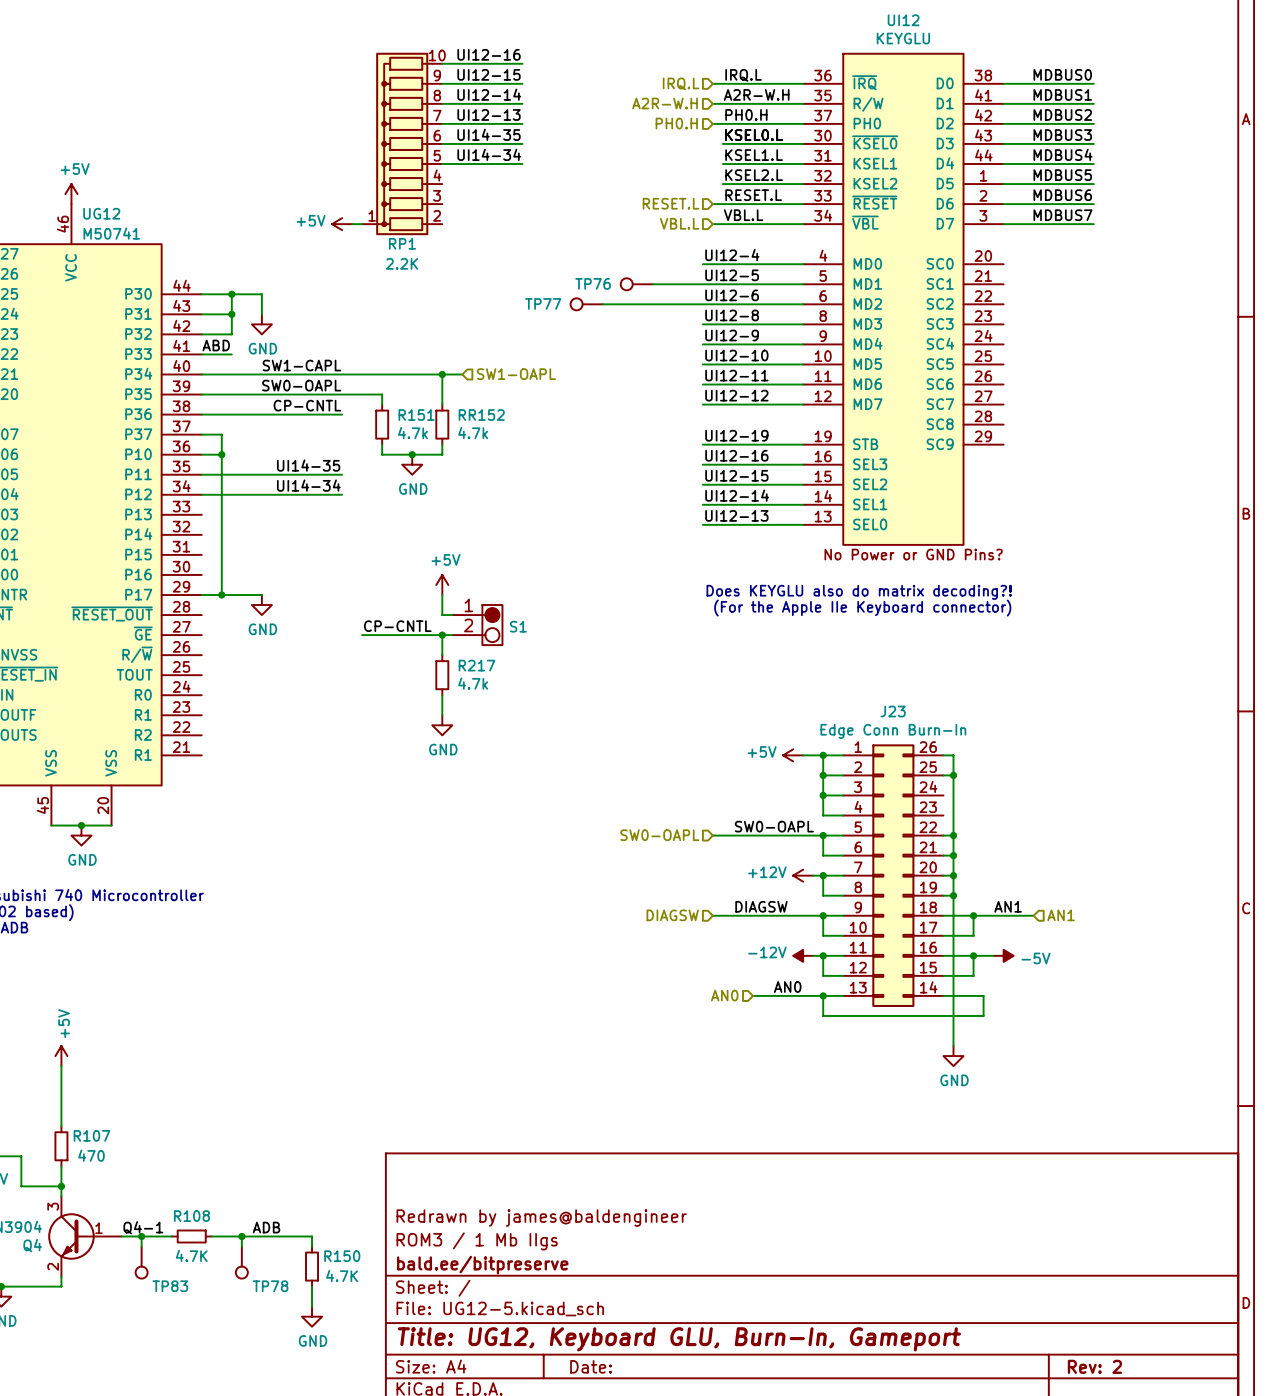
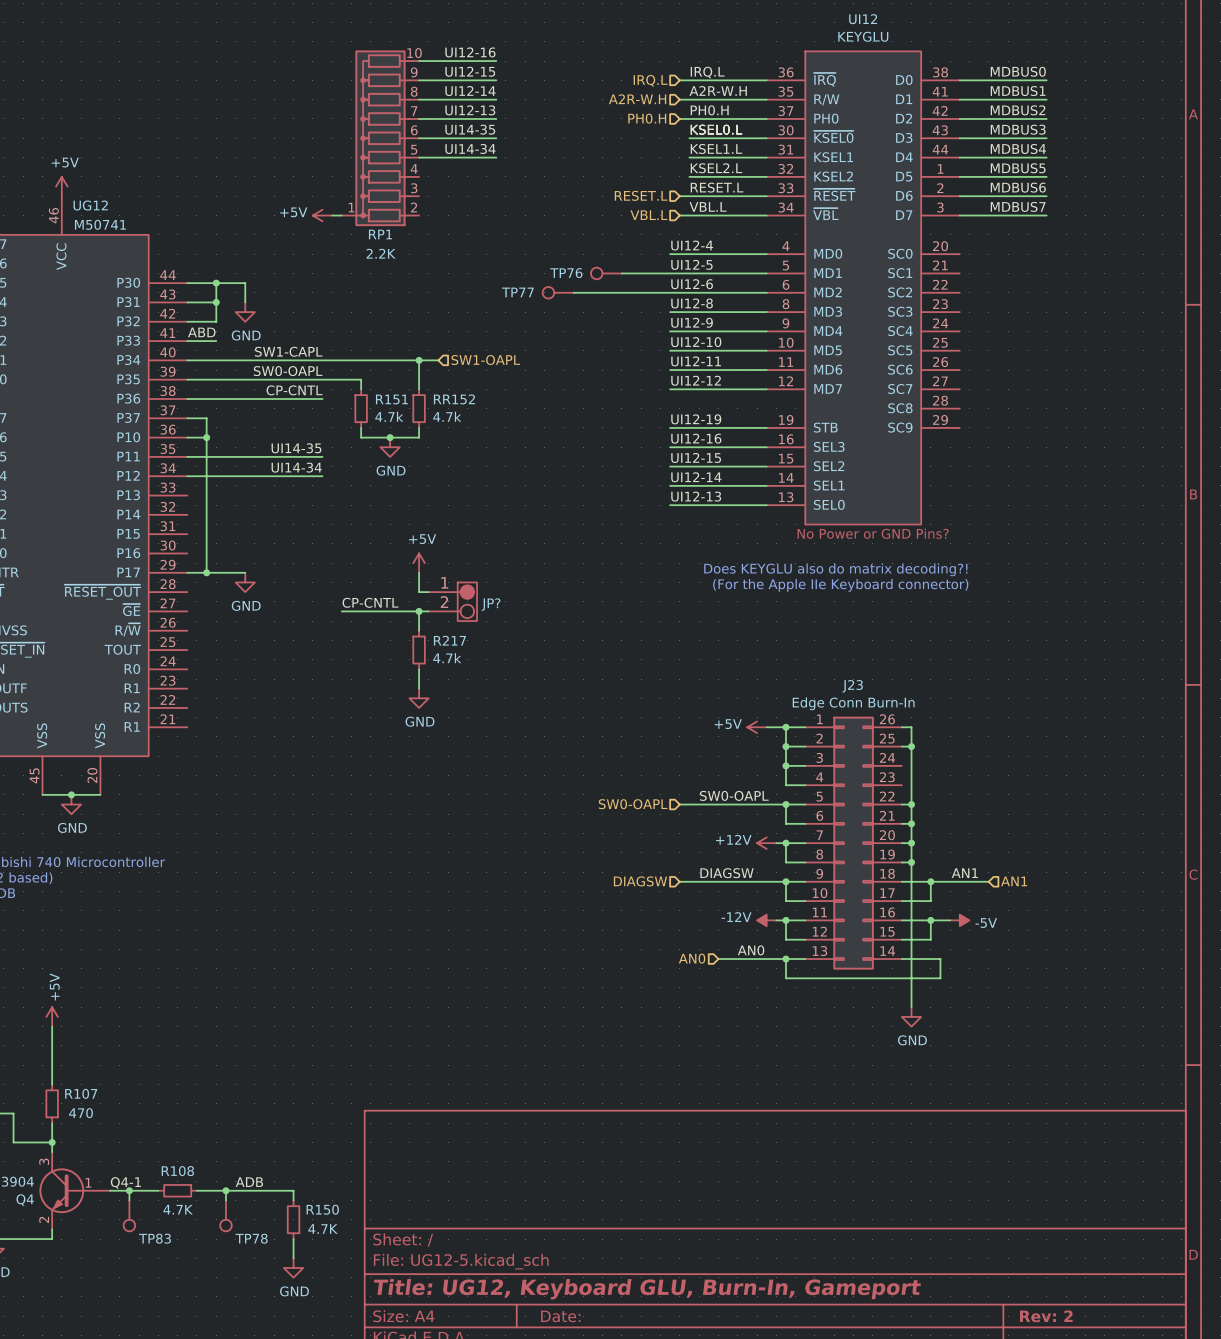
S1 name: S1 (518, 626) -> JP? (491, 604)
title block: Redrawn by james@baldengineer (541, 1218) -> none
title block: ROM3 / 1 Mb IIgs (477, 1241) -> none
title block: bald.ee/bitpreserve (482, 1265) -> none

